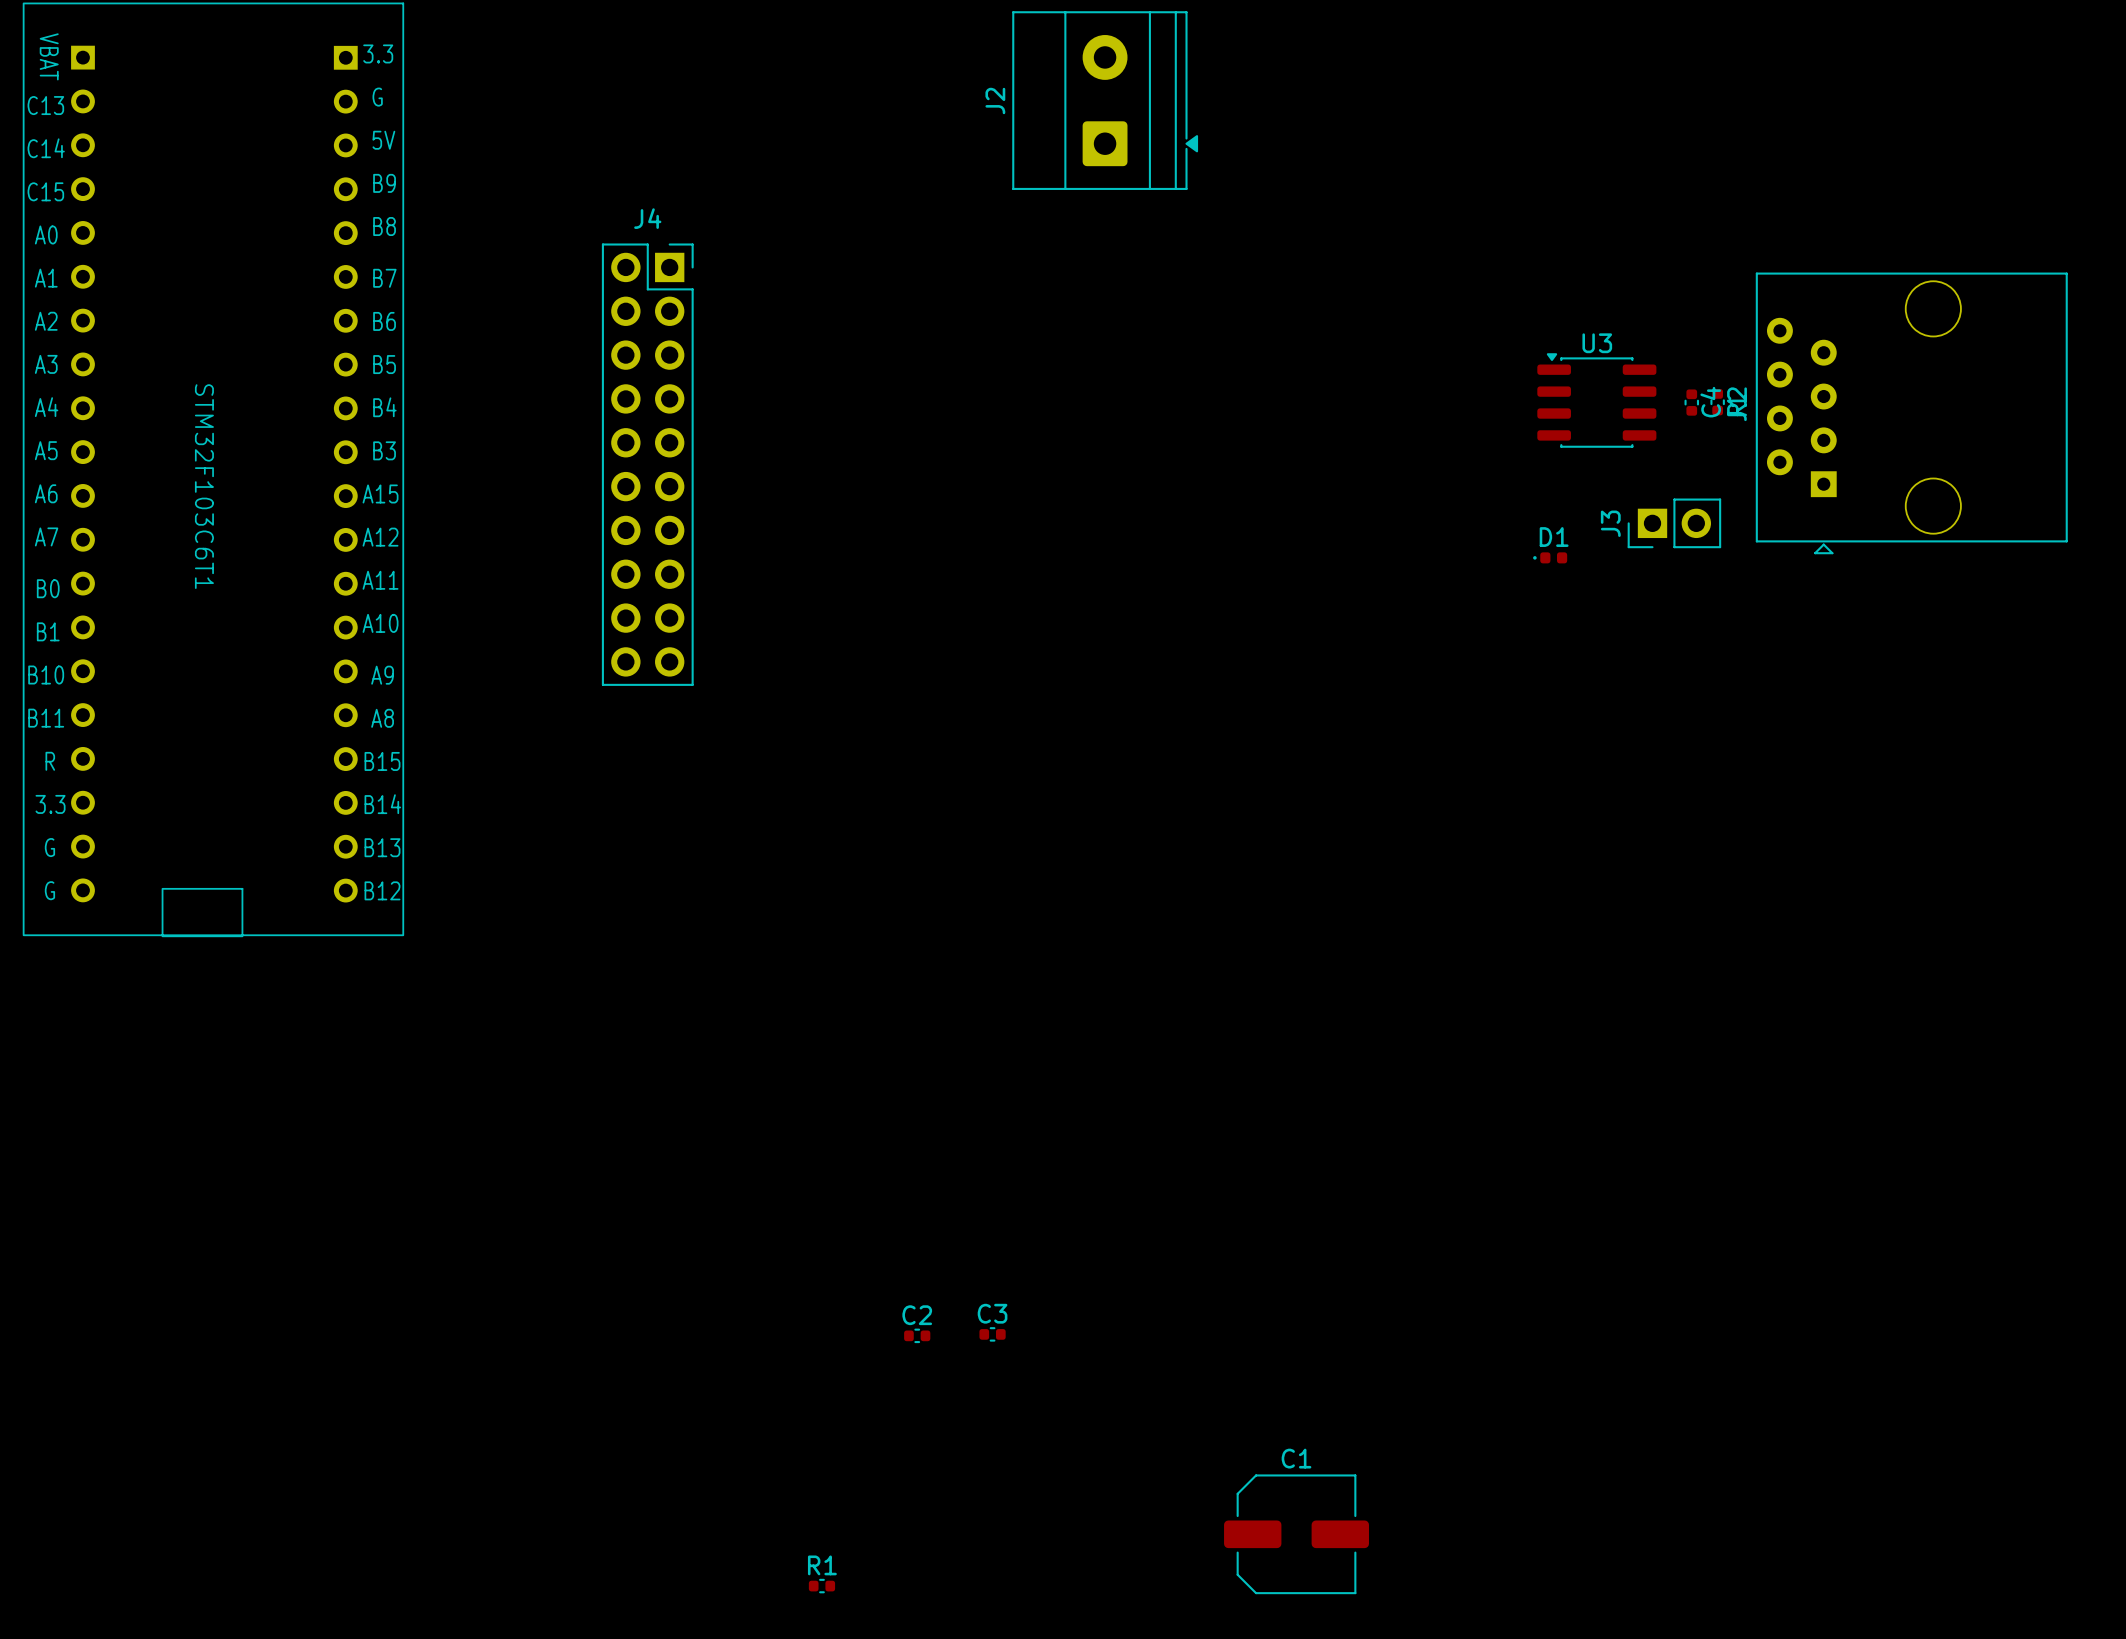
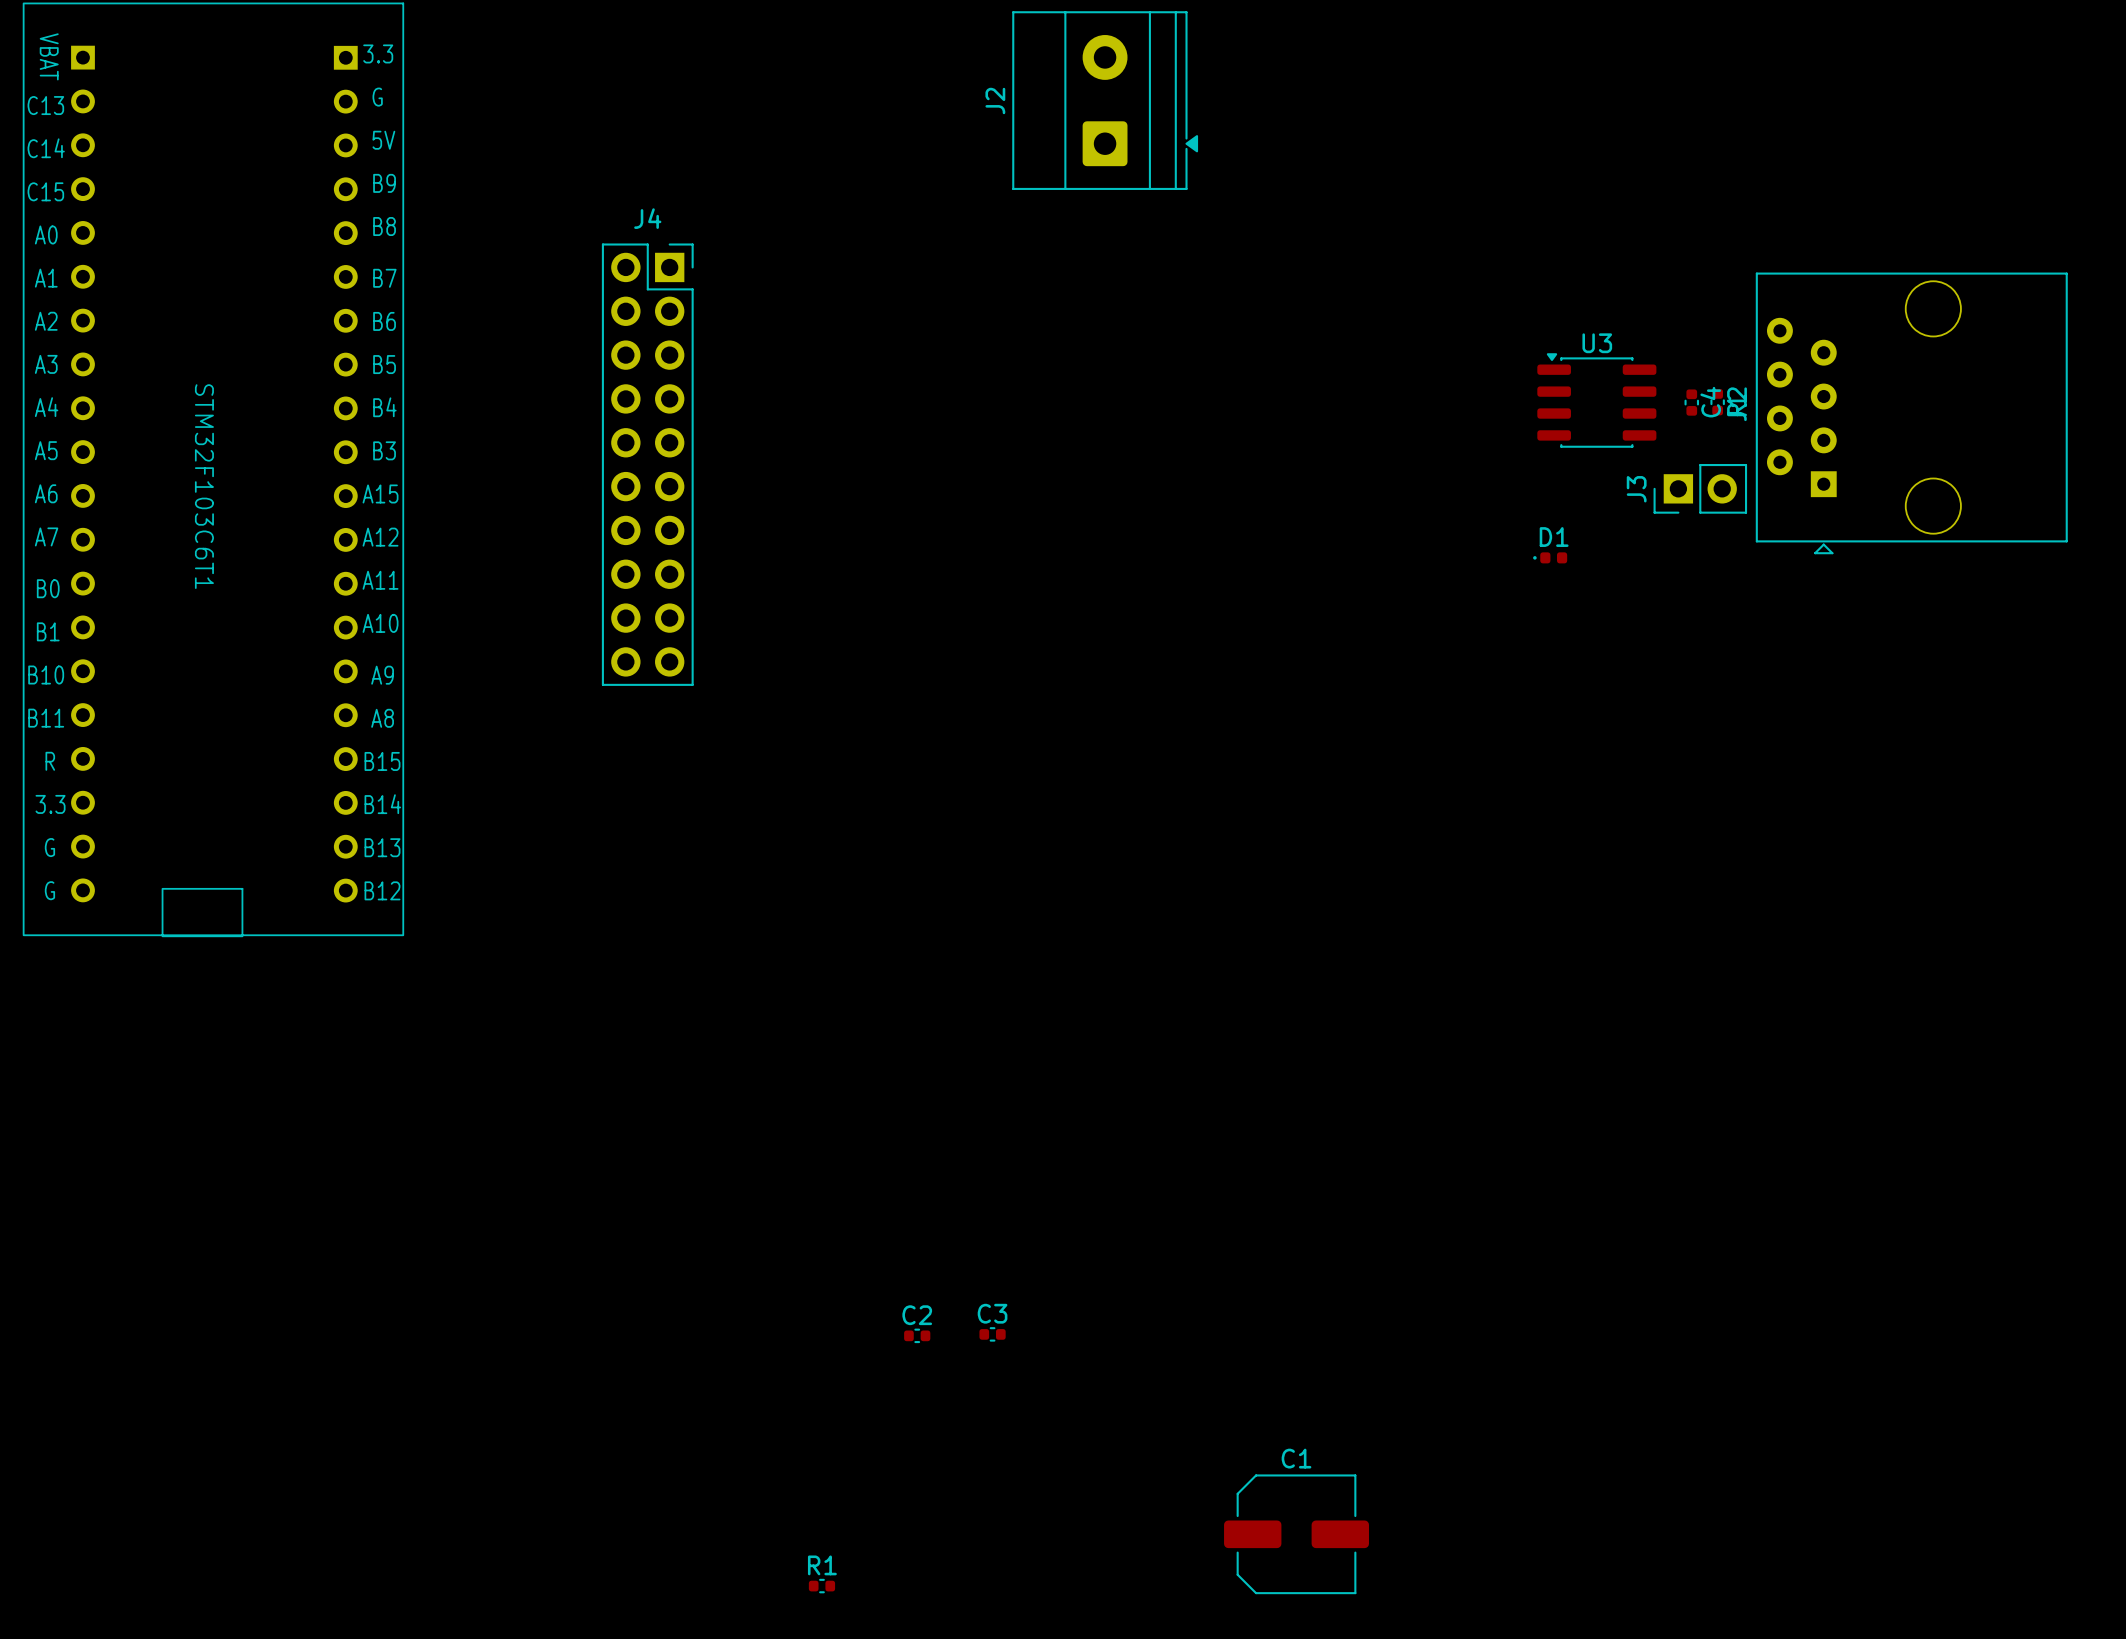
J3 position: (1674, 523) -> (1700, 488)

